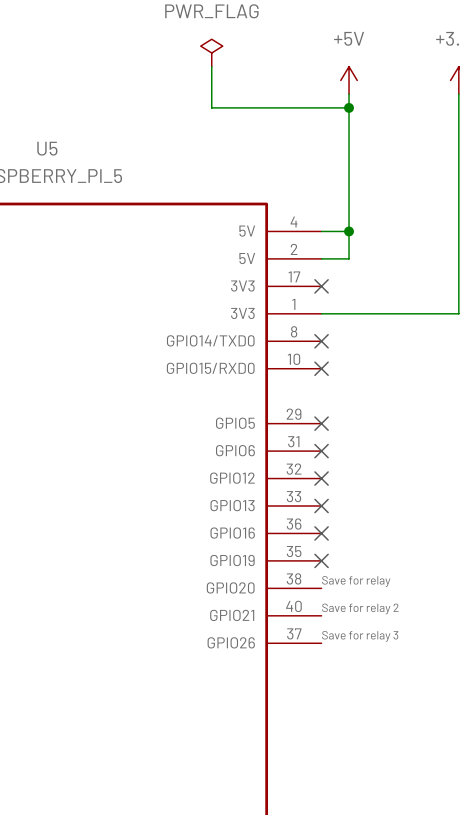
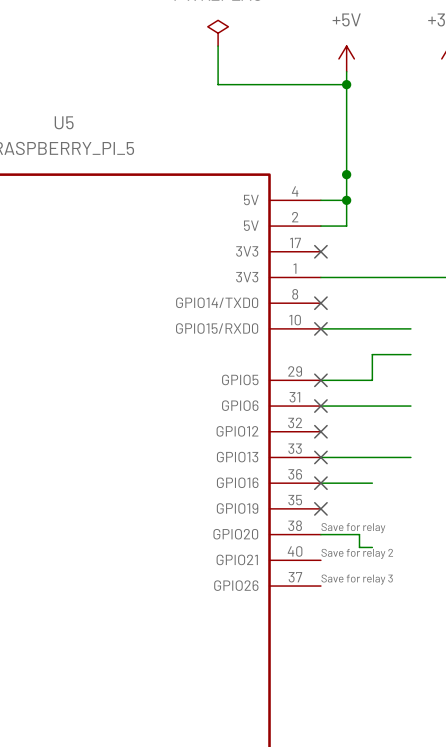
junction: none -> (346, 174)
wire: none -> (320, 328) (410, 328)
wire: none -> (410, 354) (372, 354) (372, 380) (320, 380)
wire: none -> (320, 406) (410, 406)
wire: none -> (320, 457) (410, 457)
wire: none -> (320, 483) (372, 483)
wire: none -> (320, 534) (359, 534) (359, 547) (372, 547)

